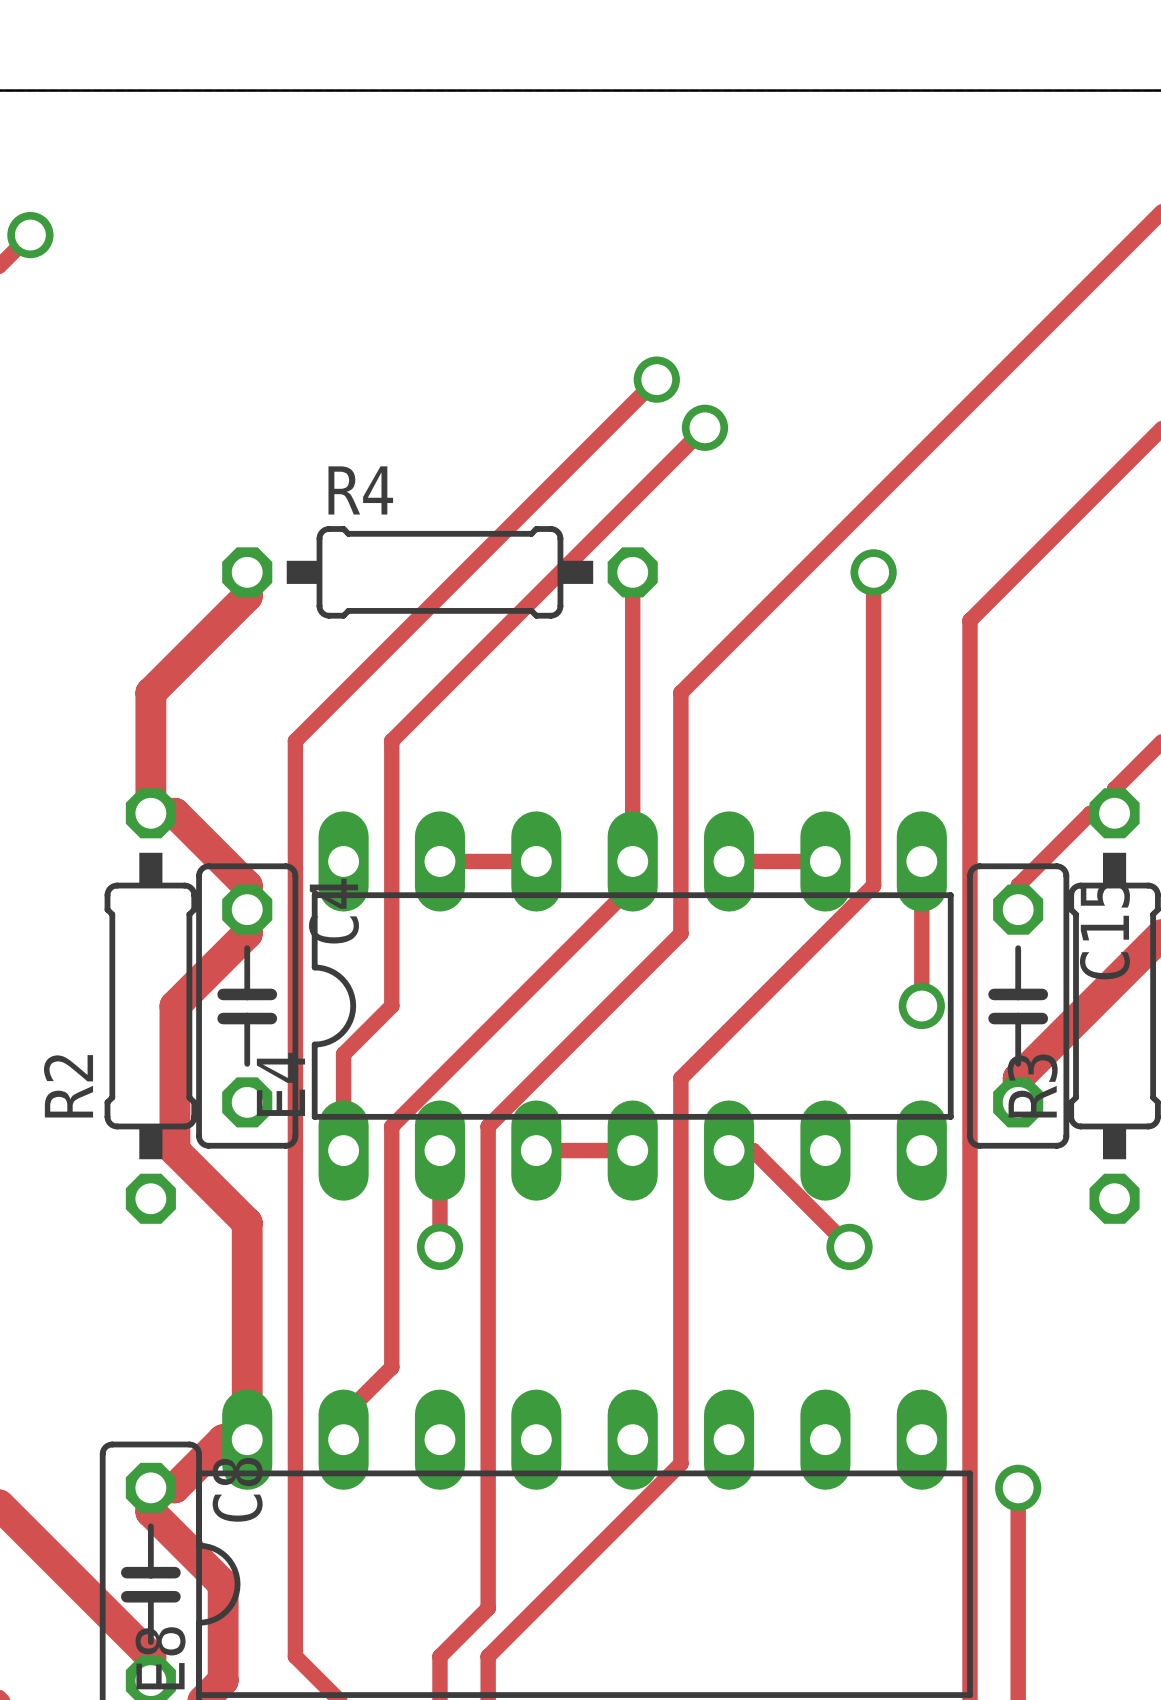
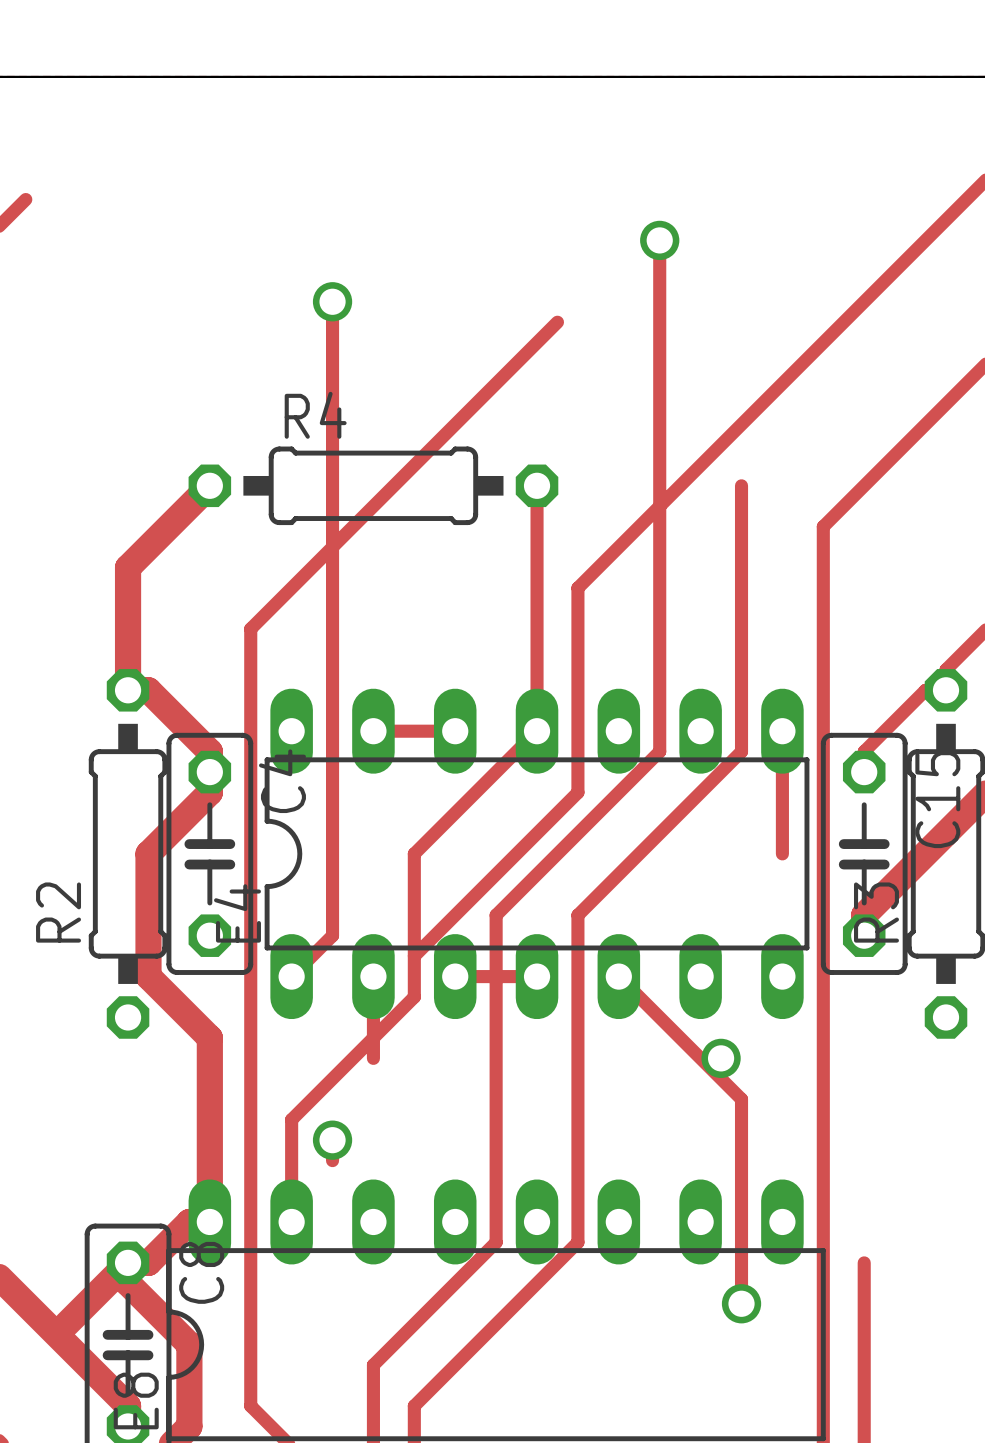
via: (30, 235) -> none
via: none -> (659, 240)
via: none -> (332, 301)
via: (656, 379) -> none
track: (704, 427) (391, 741) -> (332, 301) (332, 628)
via: (704, 427) -> none
track: (247, 572) (247, 596) (150, 692) -> (209, 485) (128, 567) (128, 588)
via: (873, 572) -> none
track: (632, 861) (632, 885) (391, 1126) (391, 1343) -> (537, 731) (414, 853) (414, 956)
track: (729, 861) (825, 861) -> none
track: (391, 1006) (343, 1054) (343, 1150) -> (332, 853) (332, 935) (291, 976)
via: (921, 1006) -> none
track: (729, 1150) (753, 1150) (849, 1246) -> (618, 976) (741, 1099) (741, 1303)
track: (488, 1174) (488, 1608) (439, 1656) -> (659, 240) (659, 751) (496, 915) (496, 1242) (373, 1365) (373, 1406)
via position: (439, 1246) -> (332, 1140)
track: (391, 1367) (343, 1415) -> (414, 997) (291, 1119) (291, 1201)
track: none -> (128, 1262) (66, 1324)
via: (1018, 1487) -> none
via: none -> (741, 1303)

